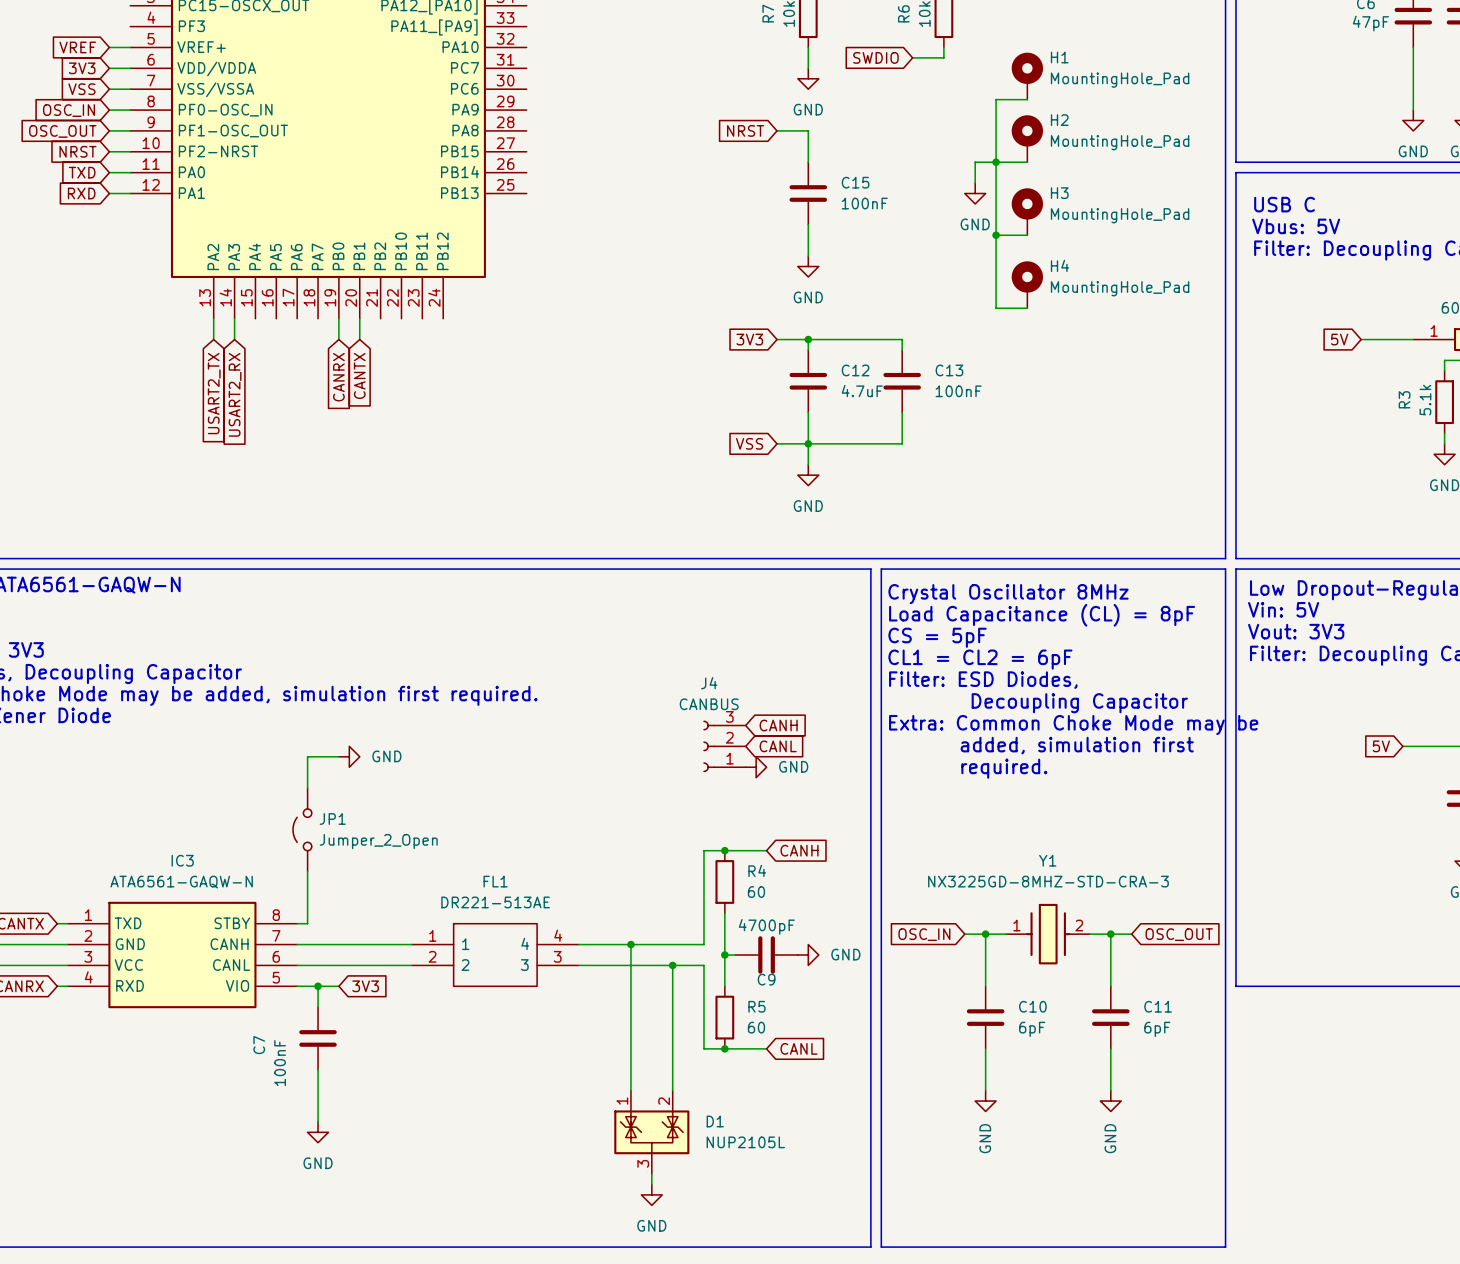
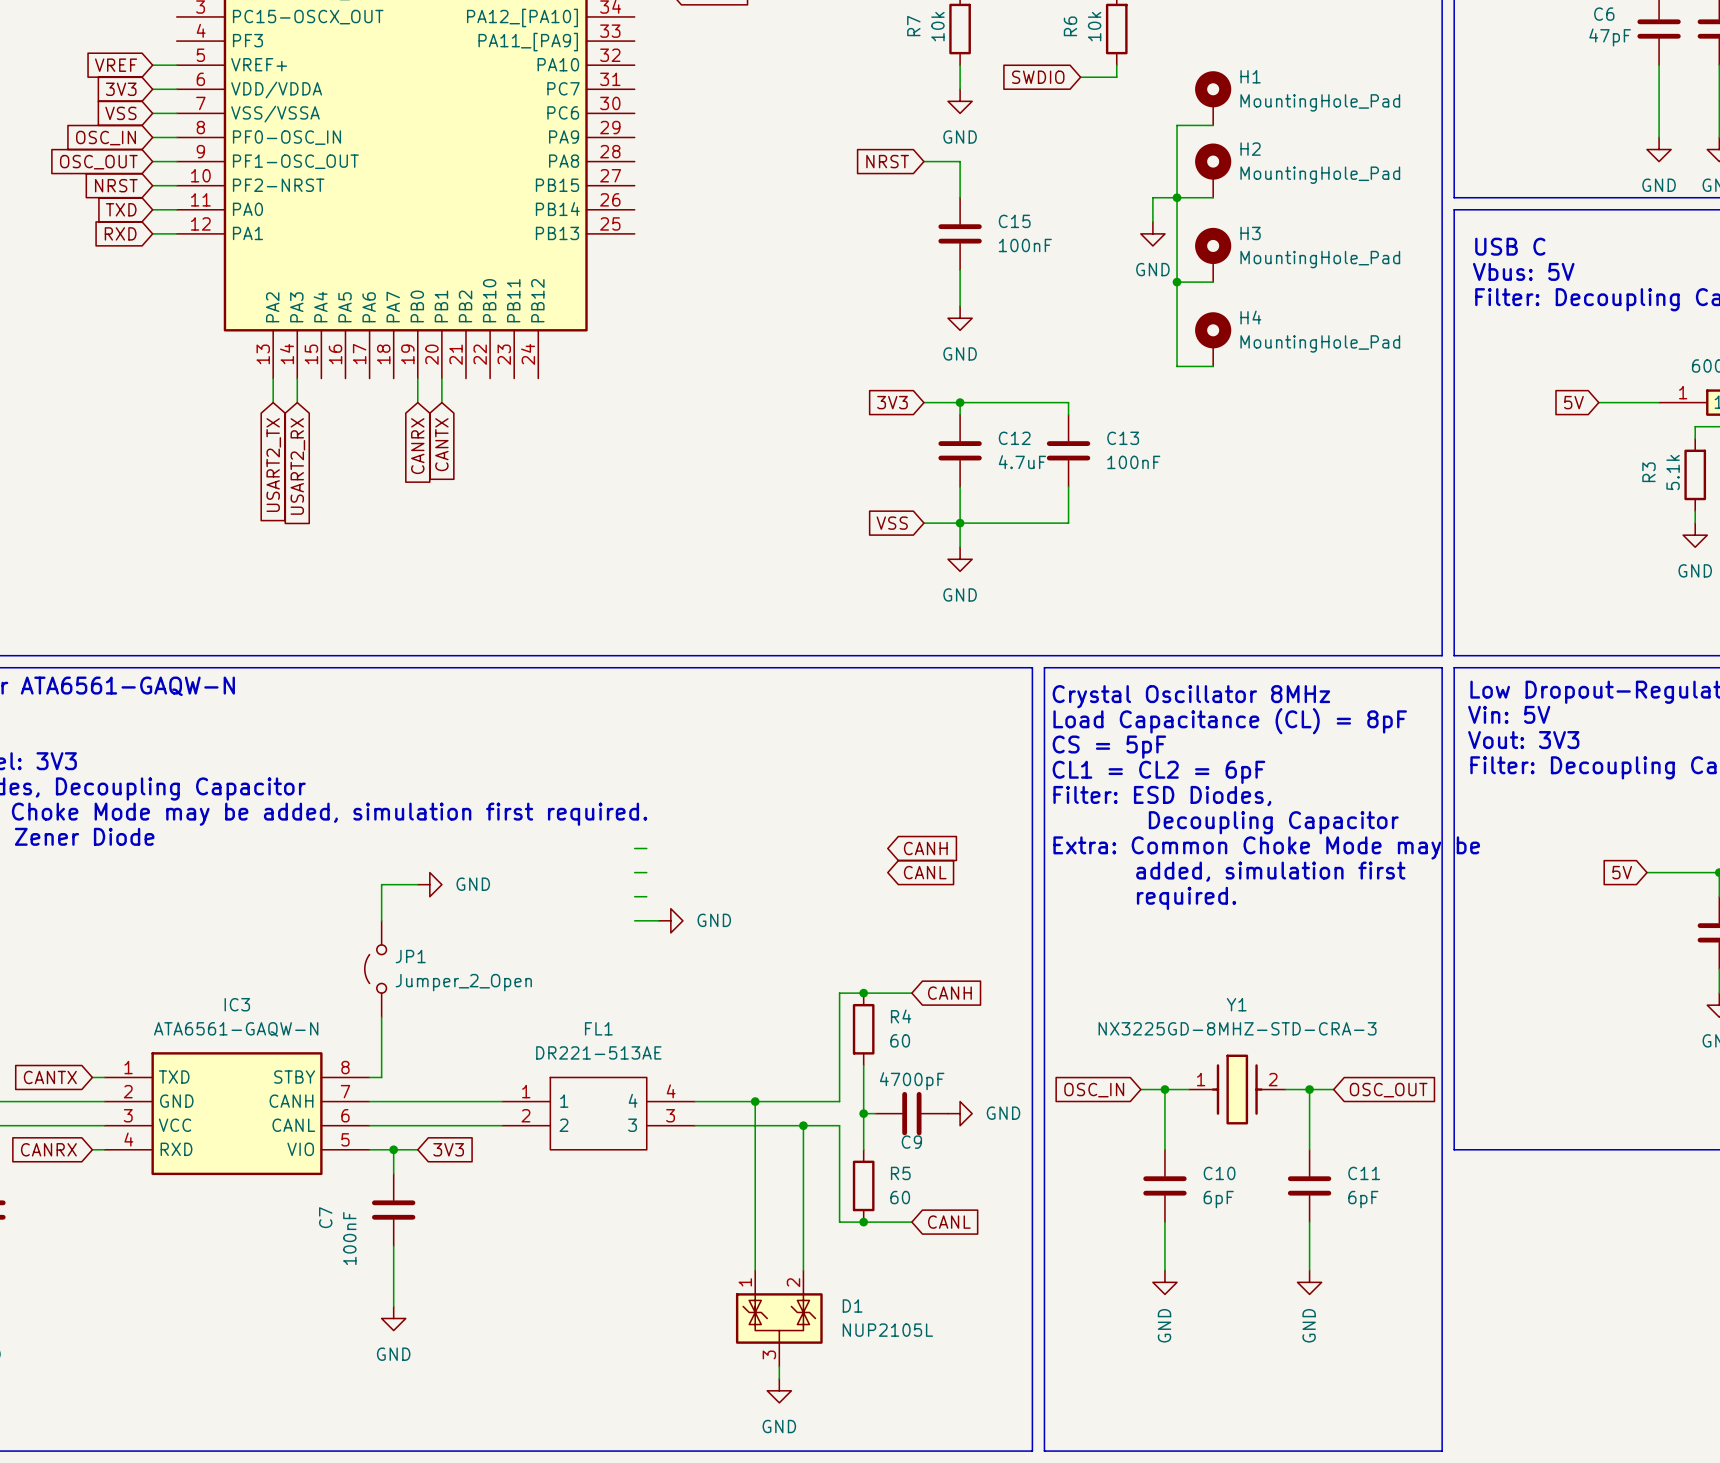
wire: none -> (634, 848) (646, 848)
wire: none -> (634, 872) (646, 872)
J4: CANBUS (724, 746) -> none
wire: none -> (634, 896) (646, 896)
power symbol position: GND (756, 767) -> GND (670, 920)
wire: none -> (634, 920) (658, 920)

